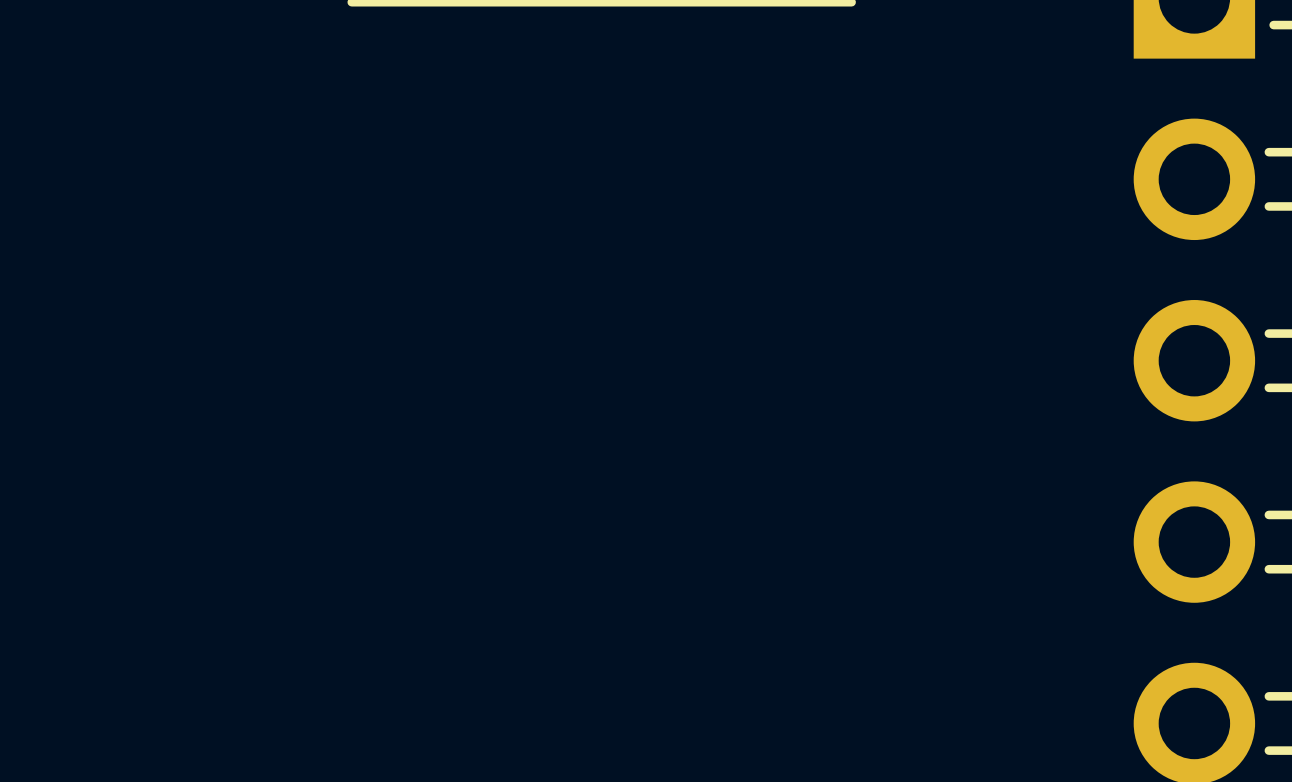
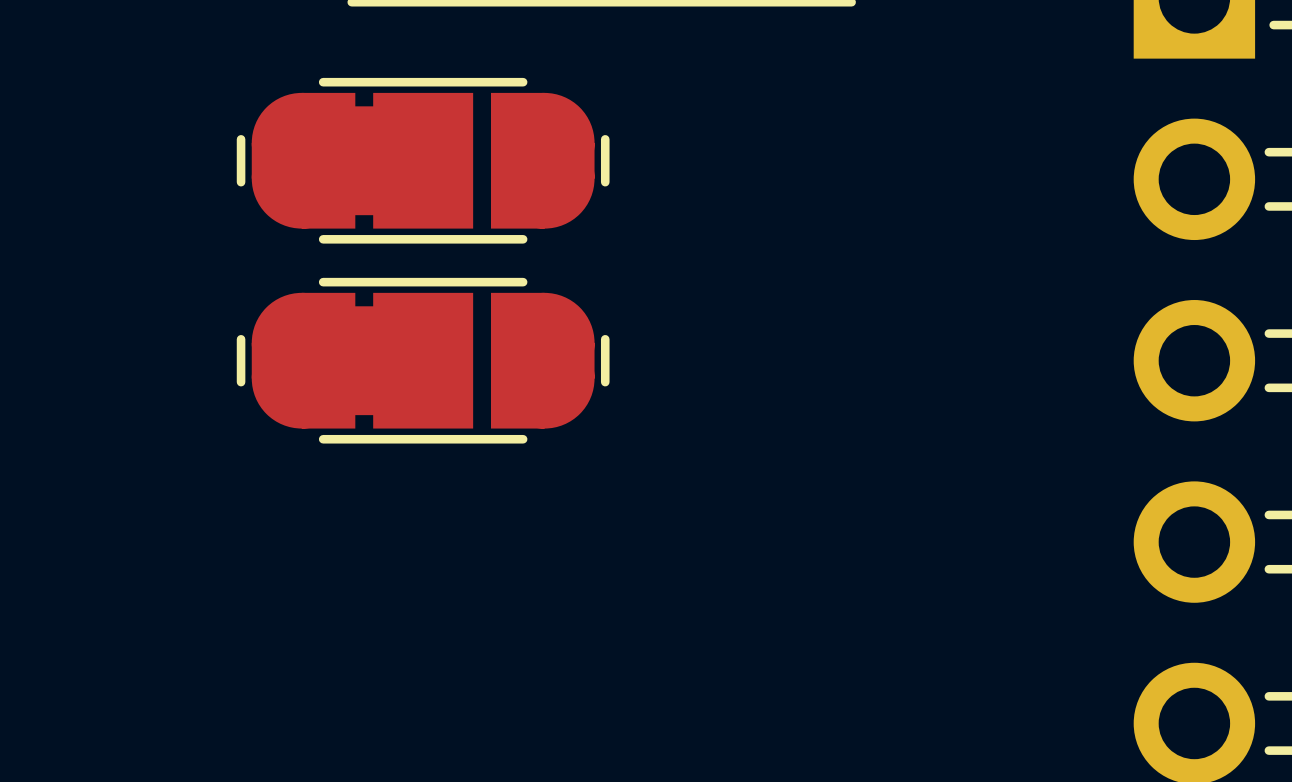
part: none -> (423, 160)
part: none -> (423, 360)

